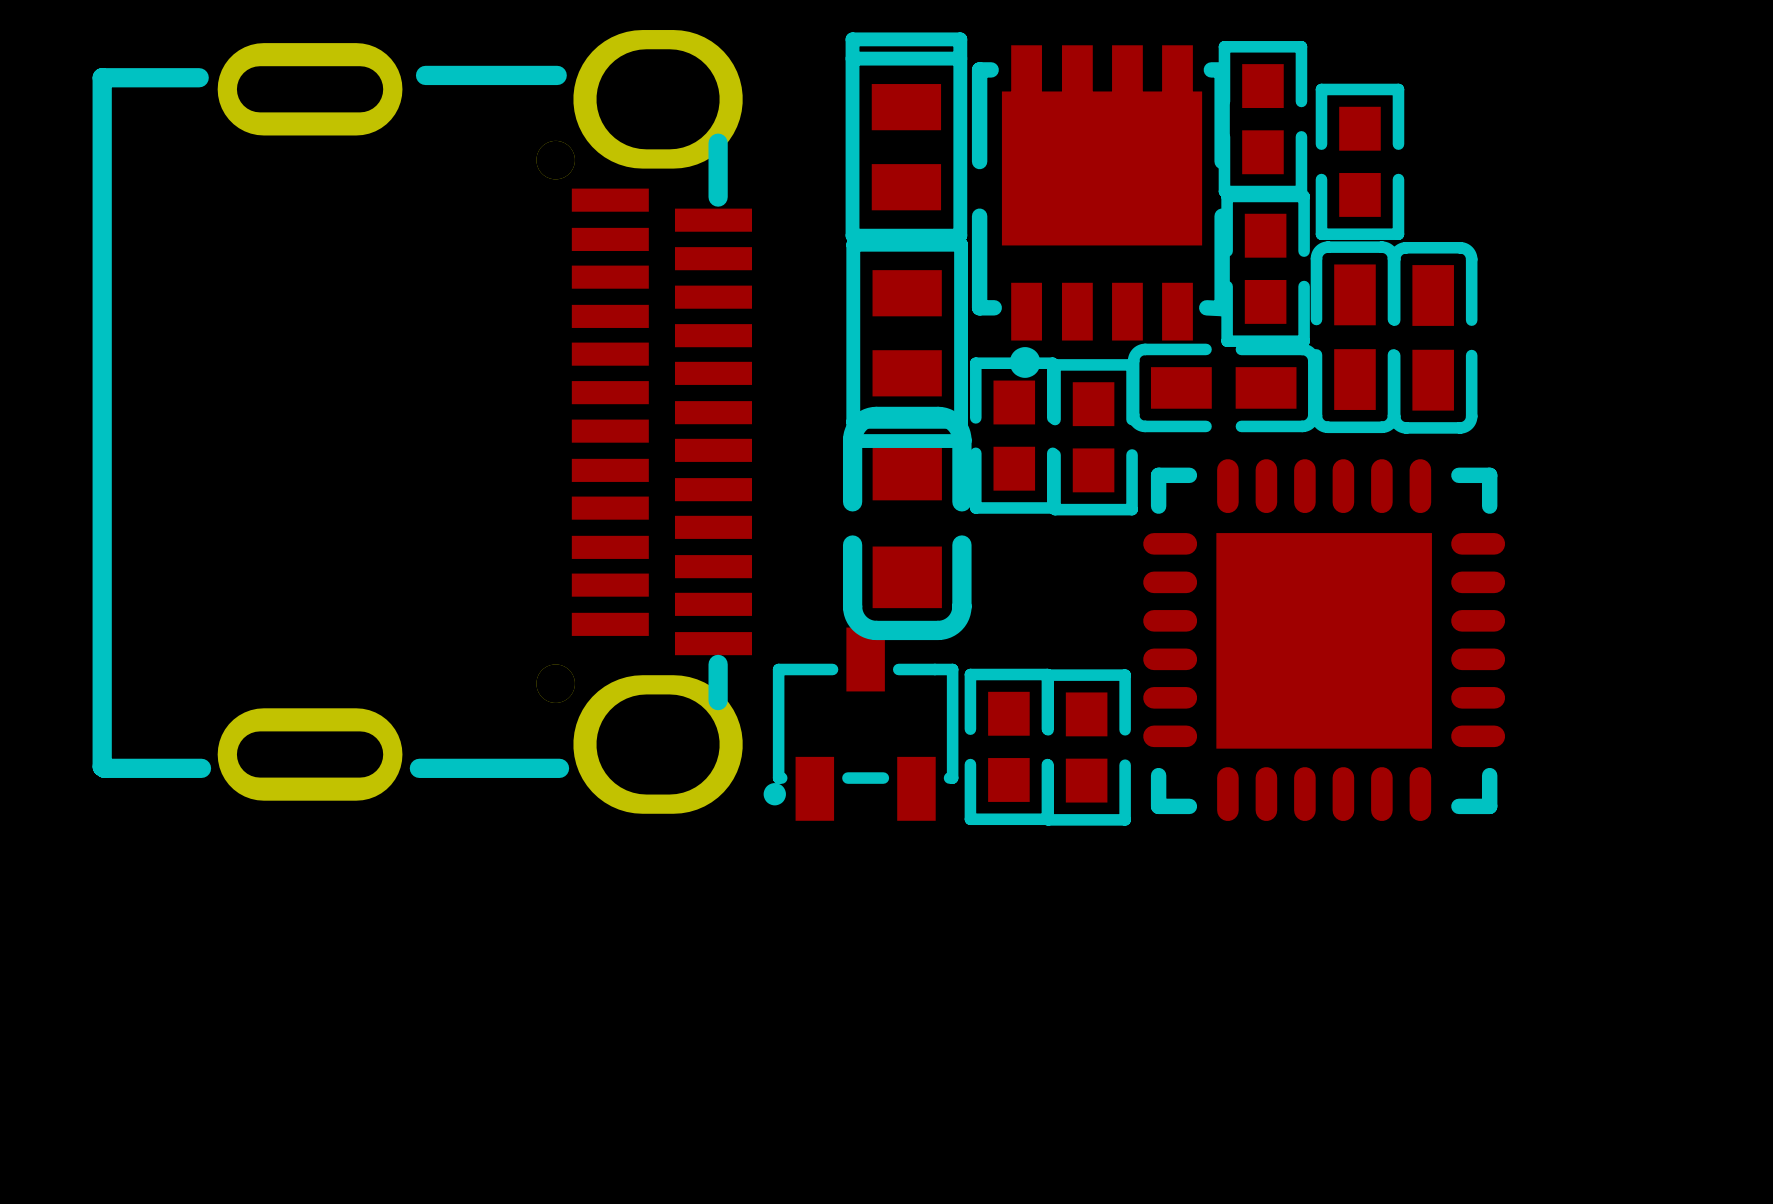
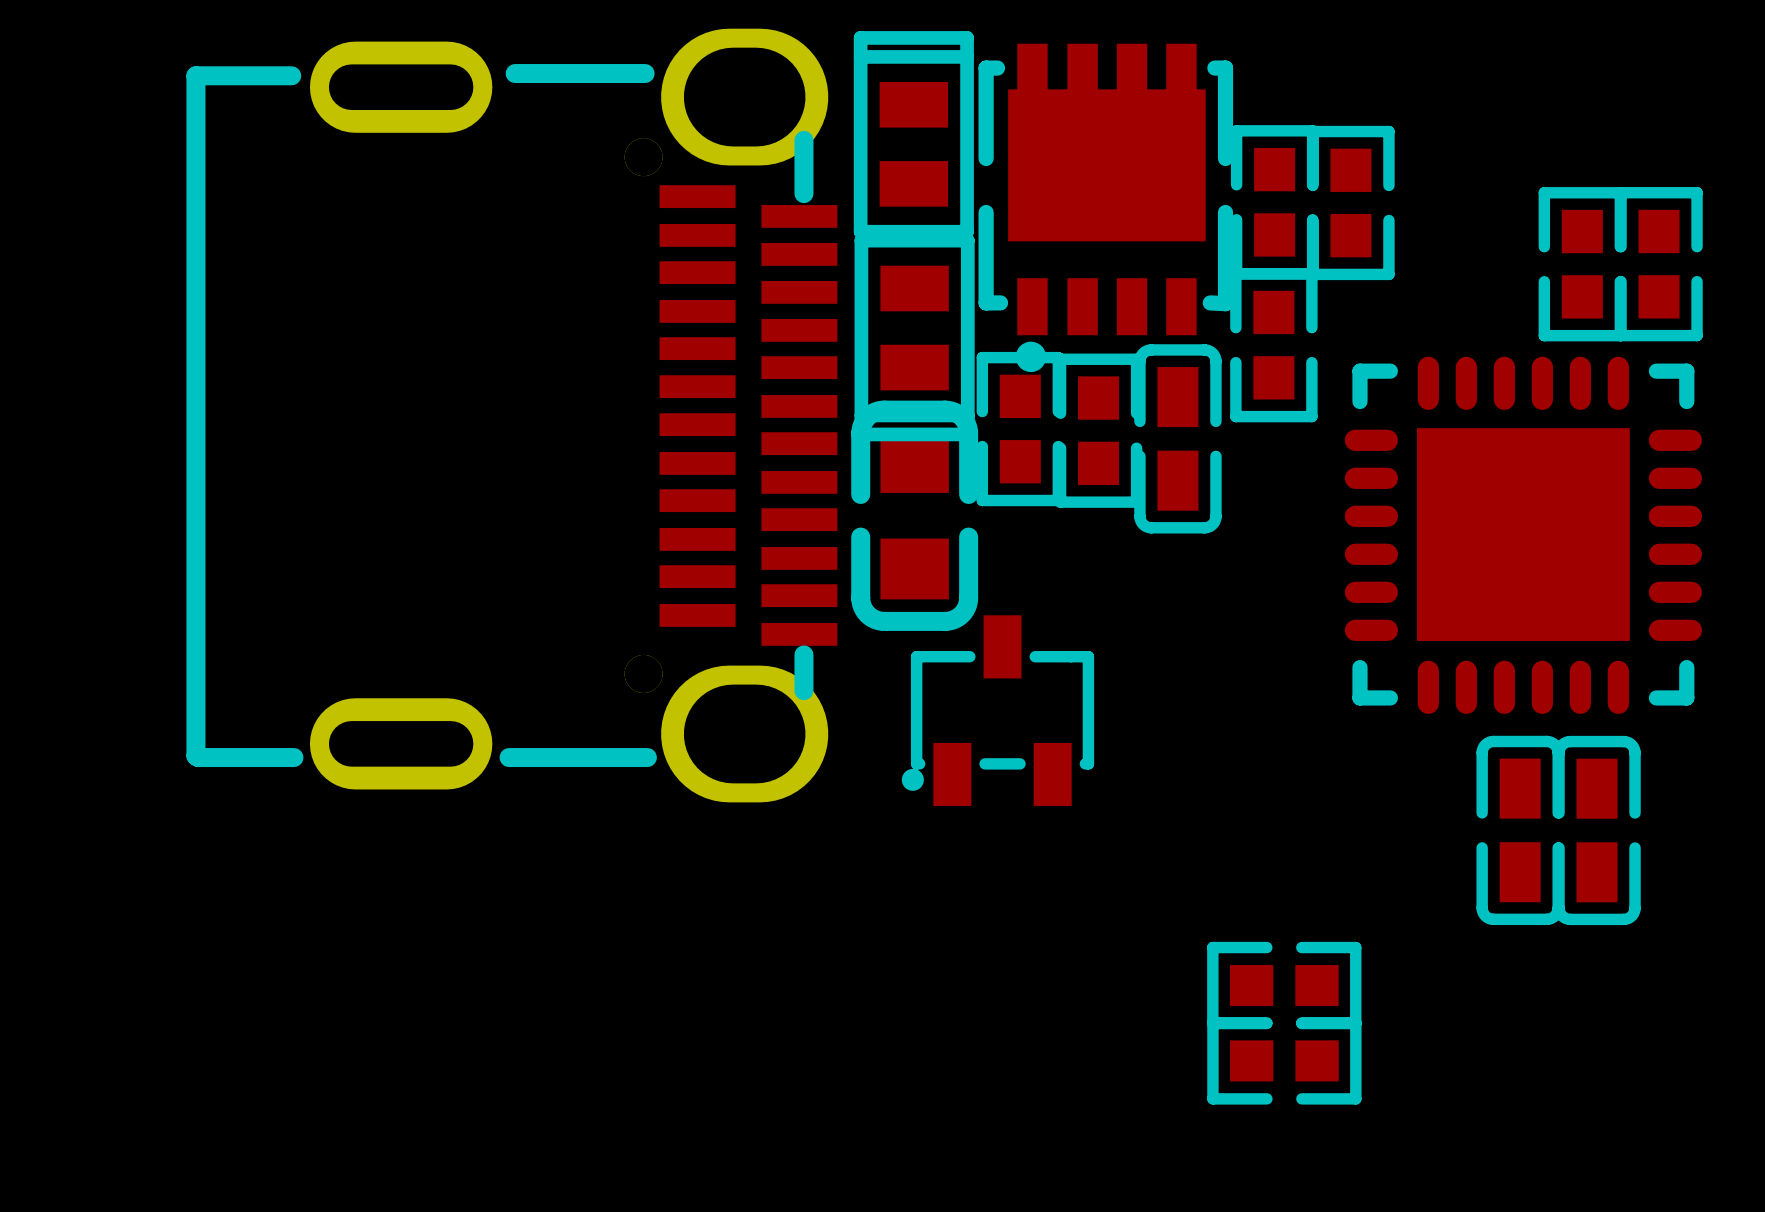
part: (1262, 119) -> none
part position: (1359, 161) -> (1350, 202)
part: none -> (1274, 202)
part: (1265, 268) -> none
part: none -> (1582, 264)
part: none -> (1659, 264)
part: (1354, 337) -> none
part: (1433, 337) -> none
part: none -> (1273, 345)
part rotation: 0° (1223, 387) -> 90° clockwise (1177, 438)
part position: (422, 421) -> (511, 415)
part position: (1324, 640) -> (1523, 535)
part footprint: [964, 668, 1054, 826] -> [901, 615, 1095, 807]
part: (861, 724) -> none
part: (1086, 747) -> none
part: none -> (1520, 830)
part: none -> (1597, 830)
part: none -> (1284, 985)
part: none -> (1284, 1060)

